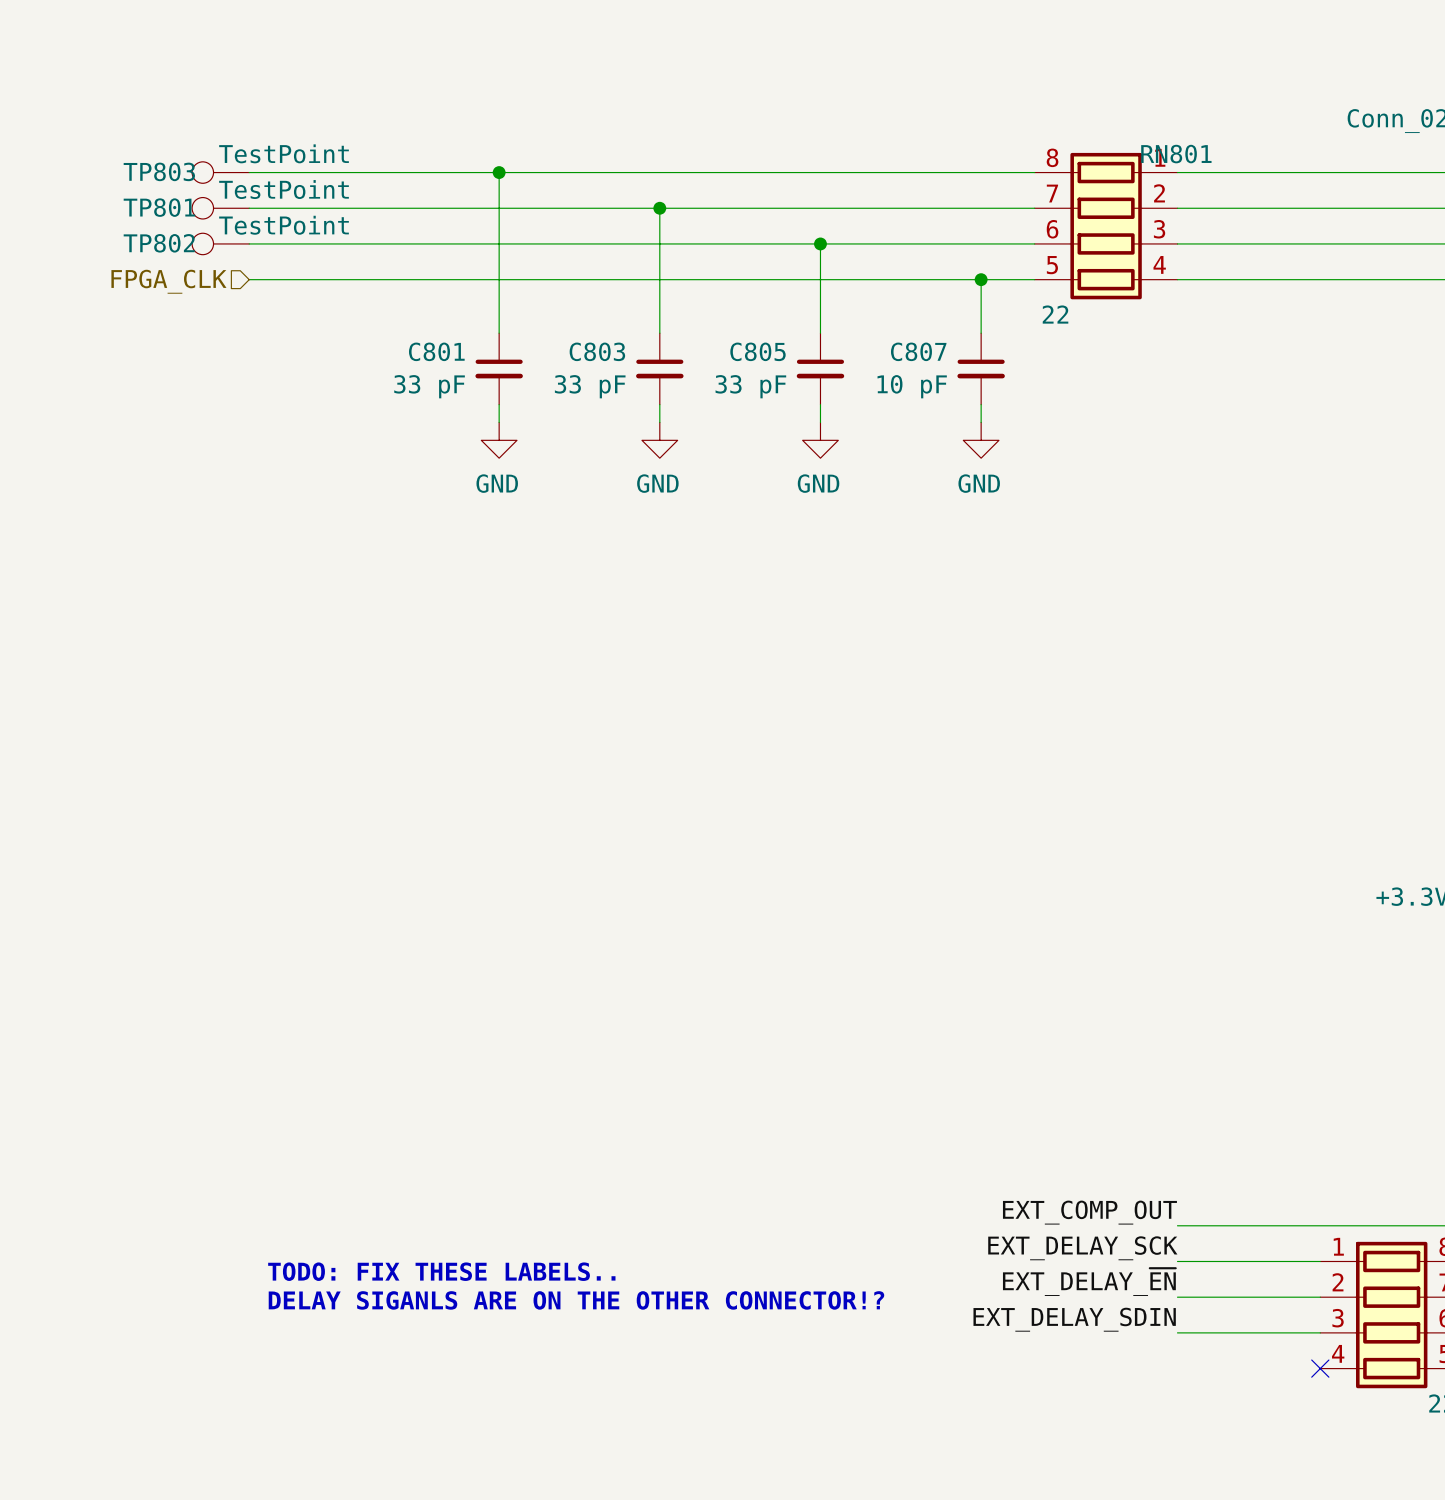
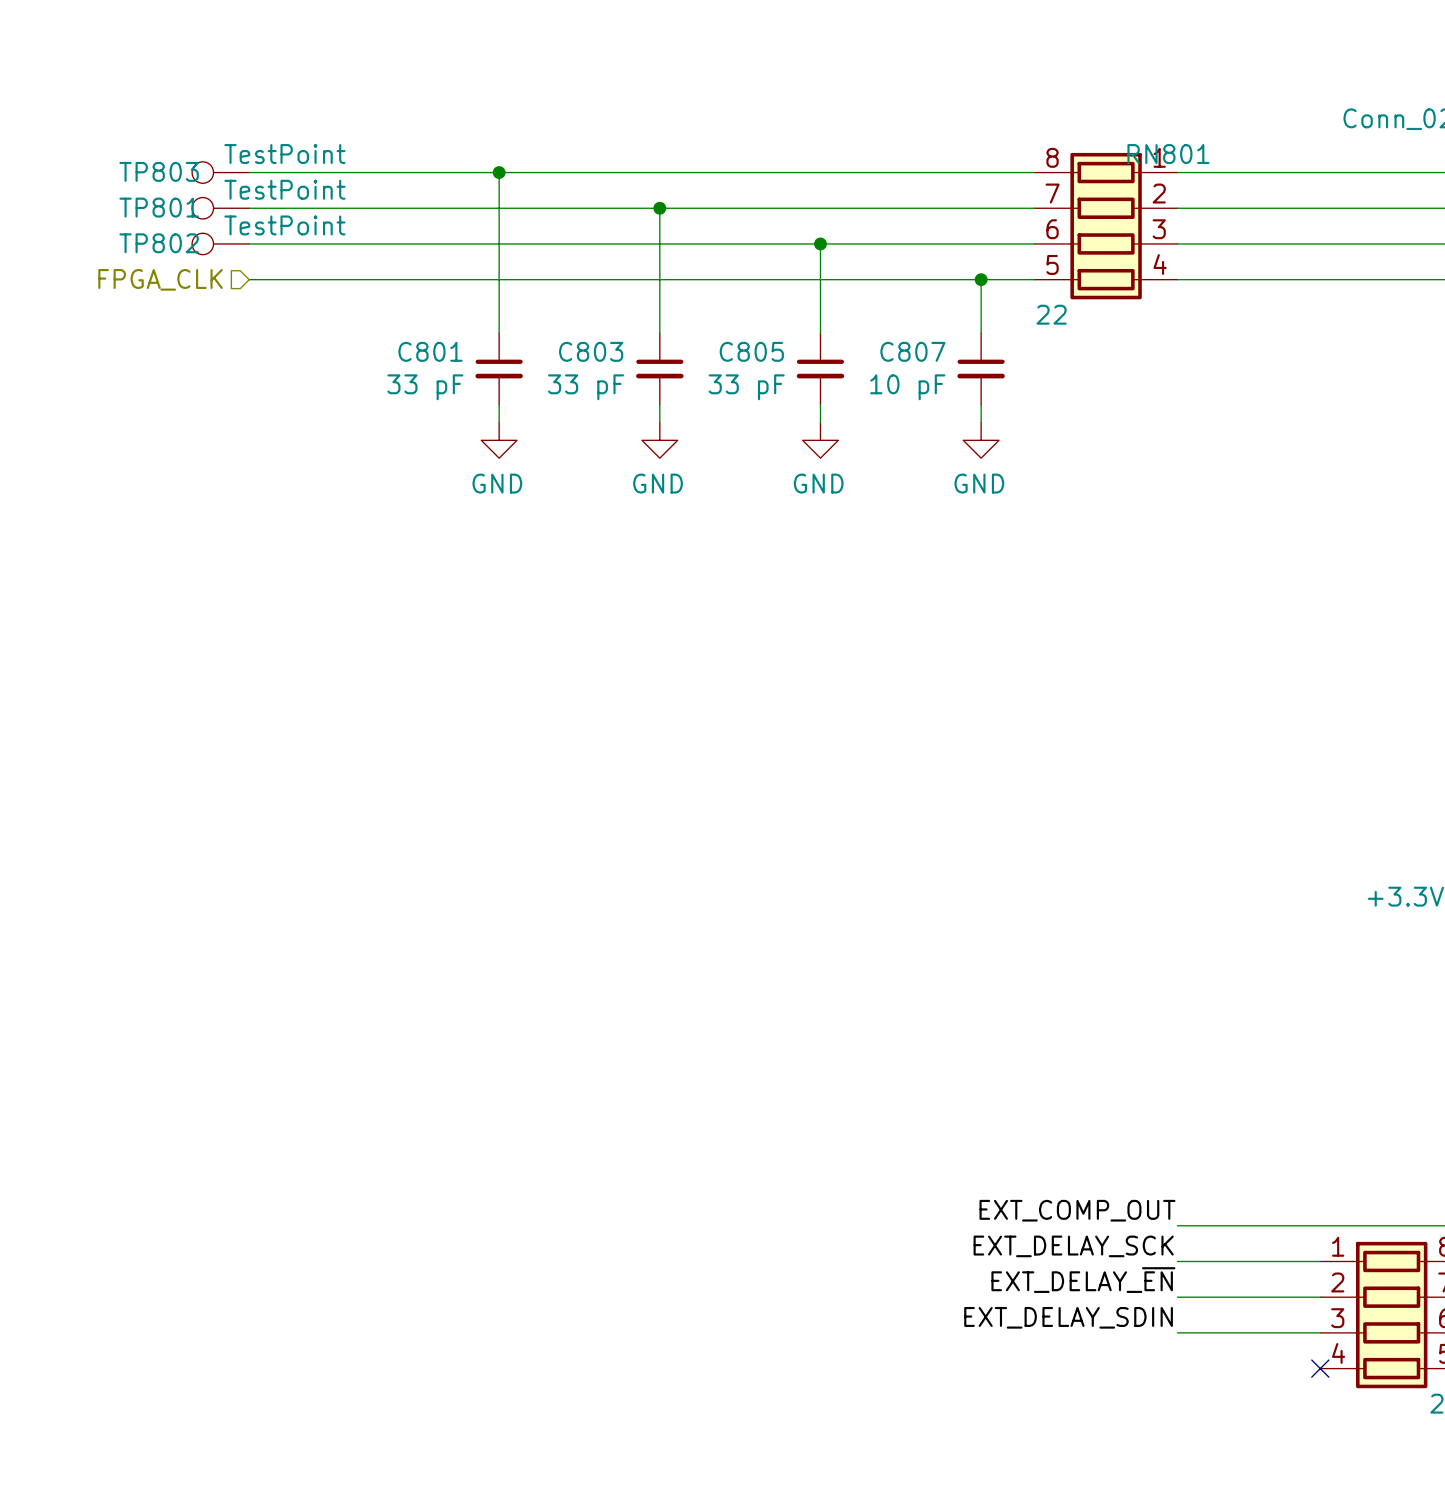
text: TODO: FIX THESE LABELS.. (441, 1271) -> none
text: DELAY SIGANLS ARE ON THE OTHER CONNECTOR!? (576, 1300) -> none

